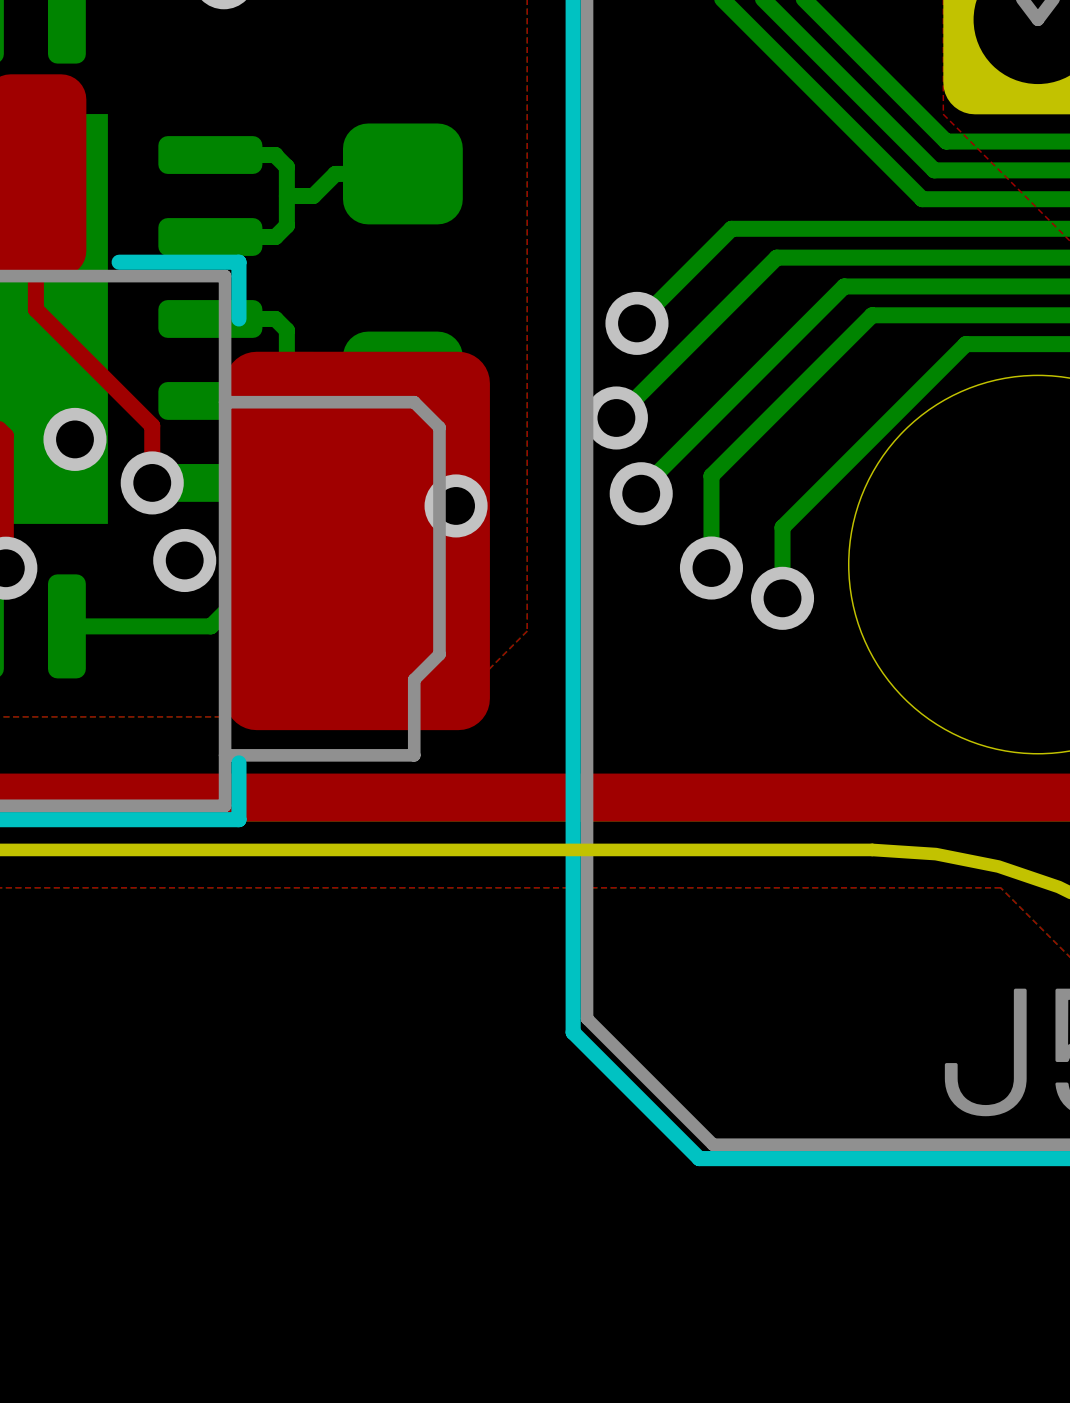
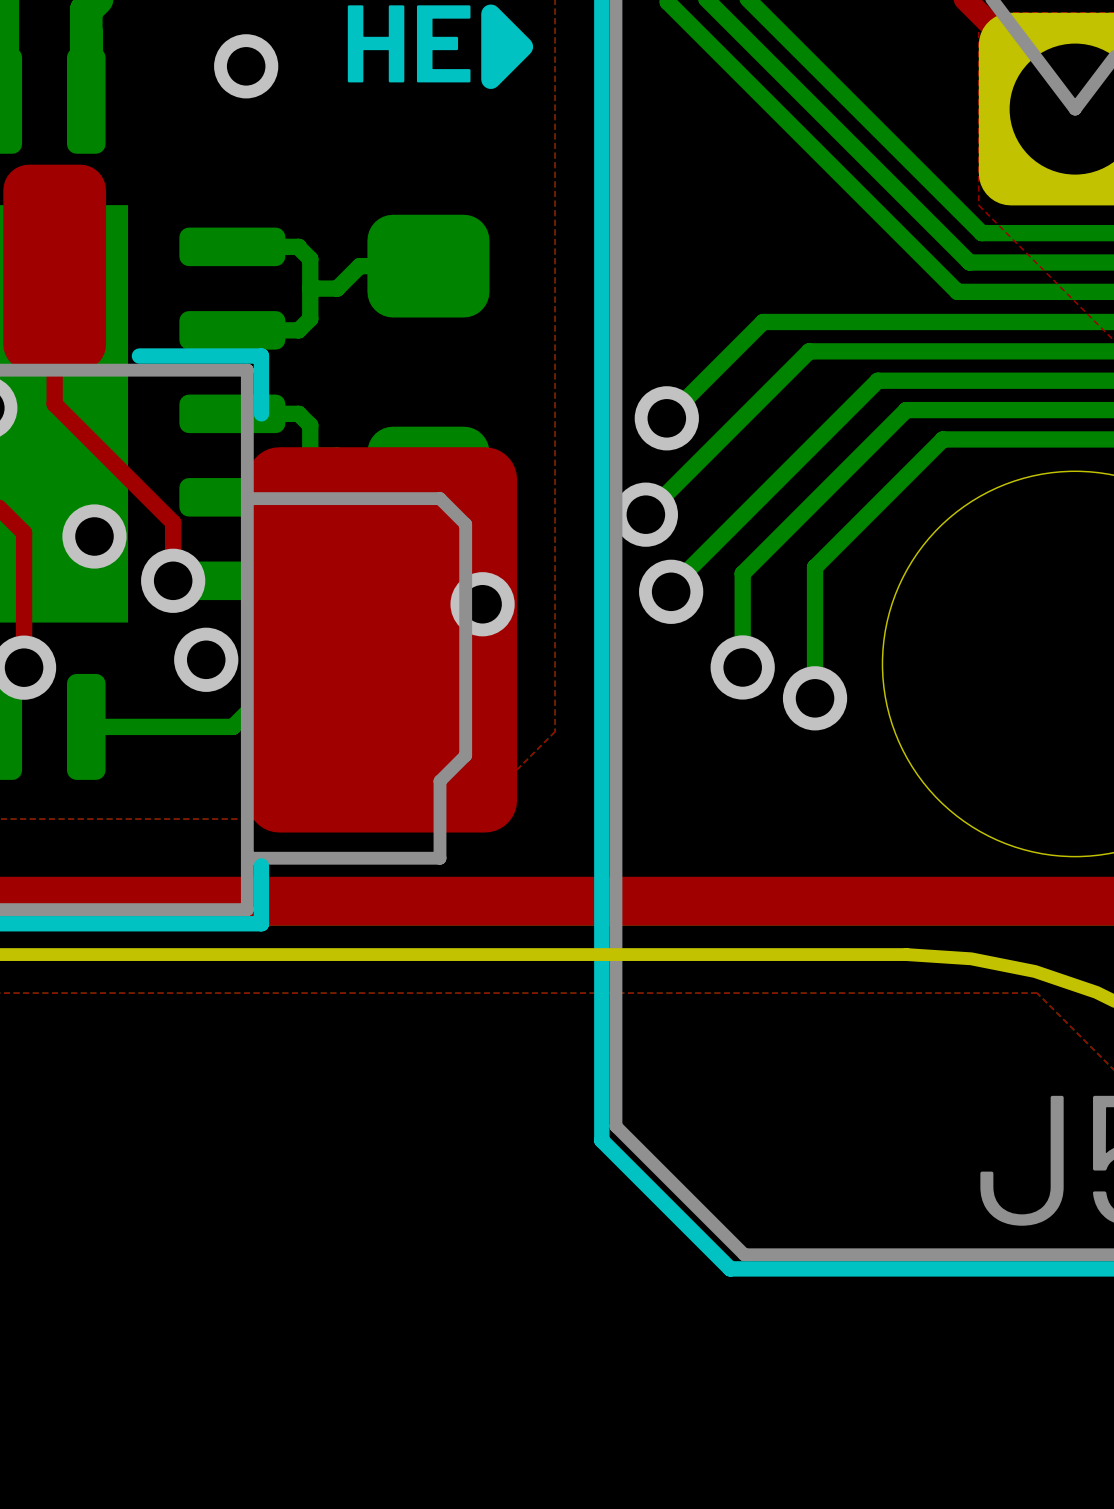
bottom track: (965, 344) (782, 527) -> (1001, 439) (942, 439) (815, 567) (815, 626)

